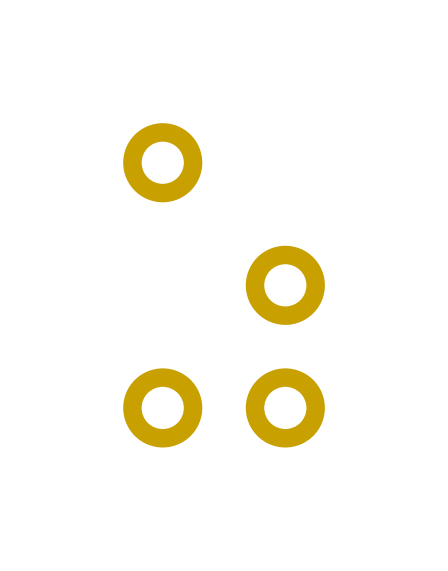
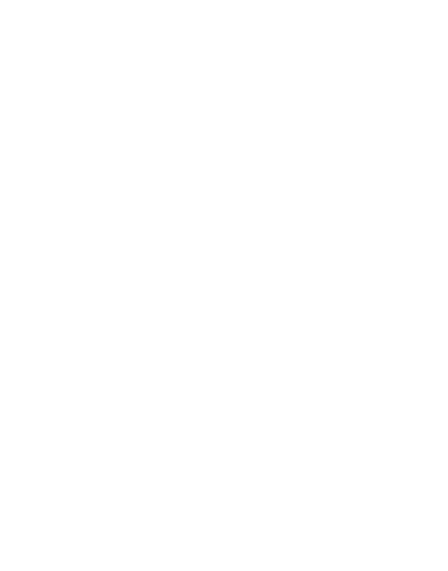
part: (162, 162) -> none
part: (285, 285) -> none
part: (162, 407) -> none
part: (285, 407) -> none

